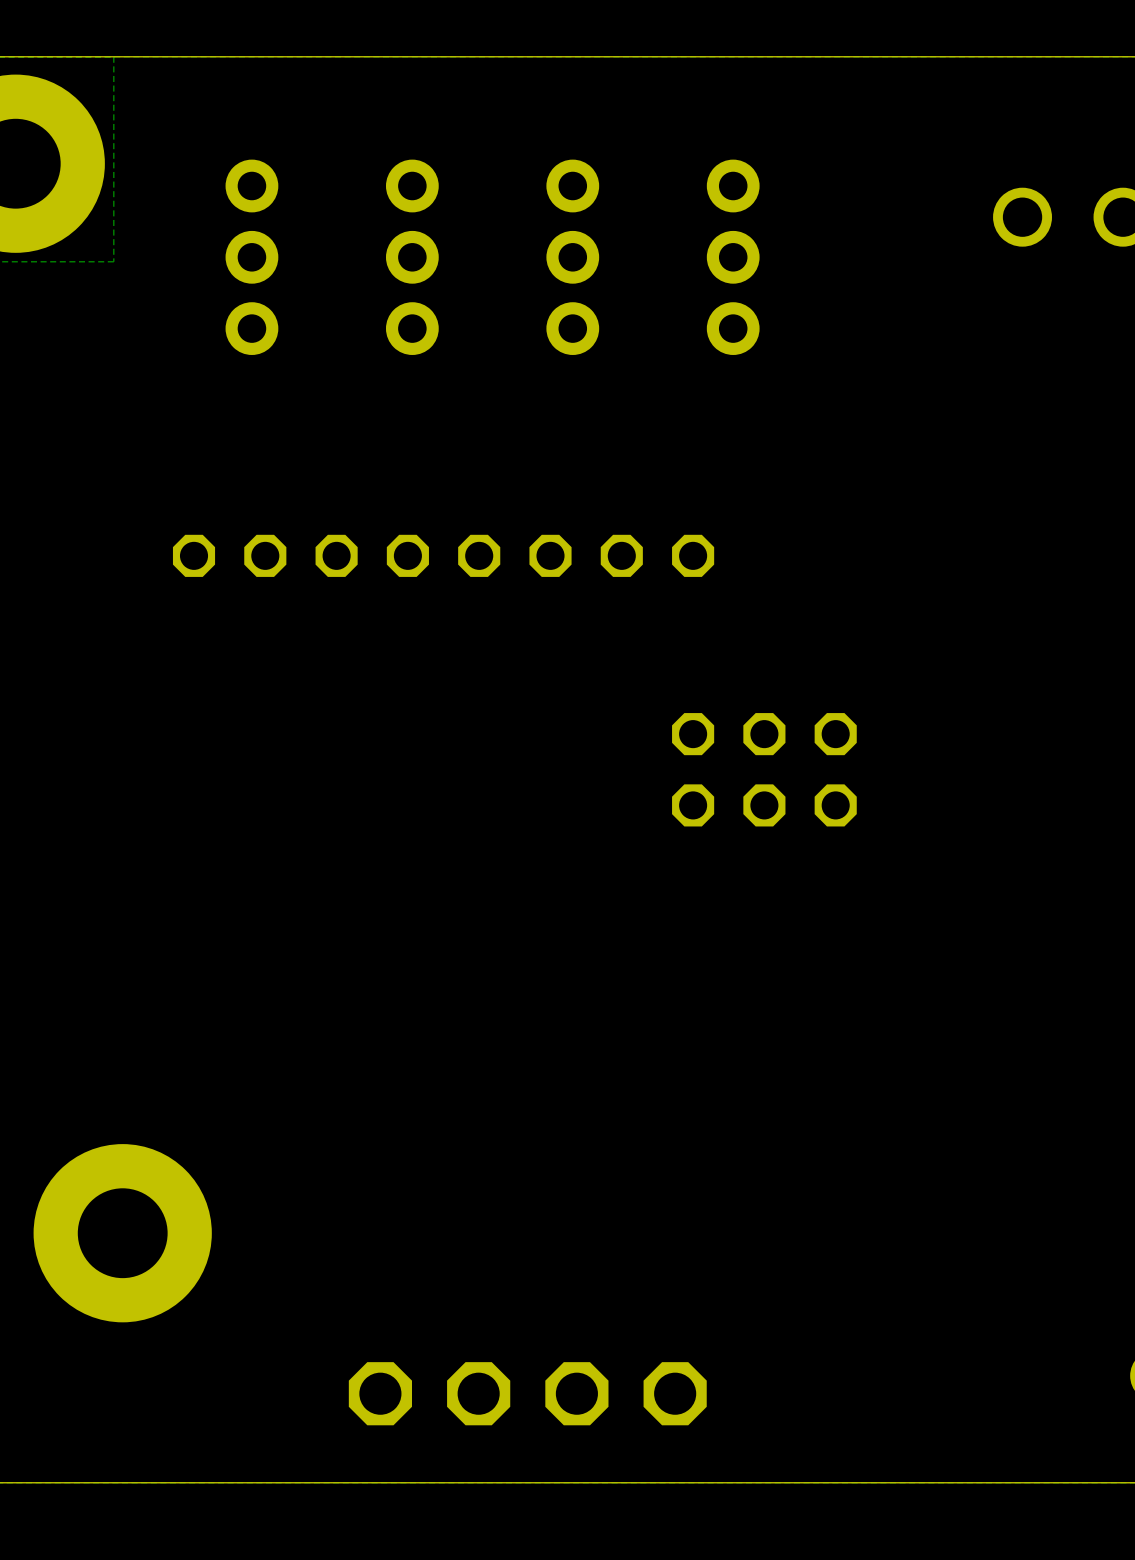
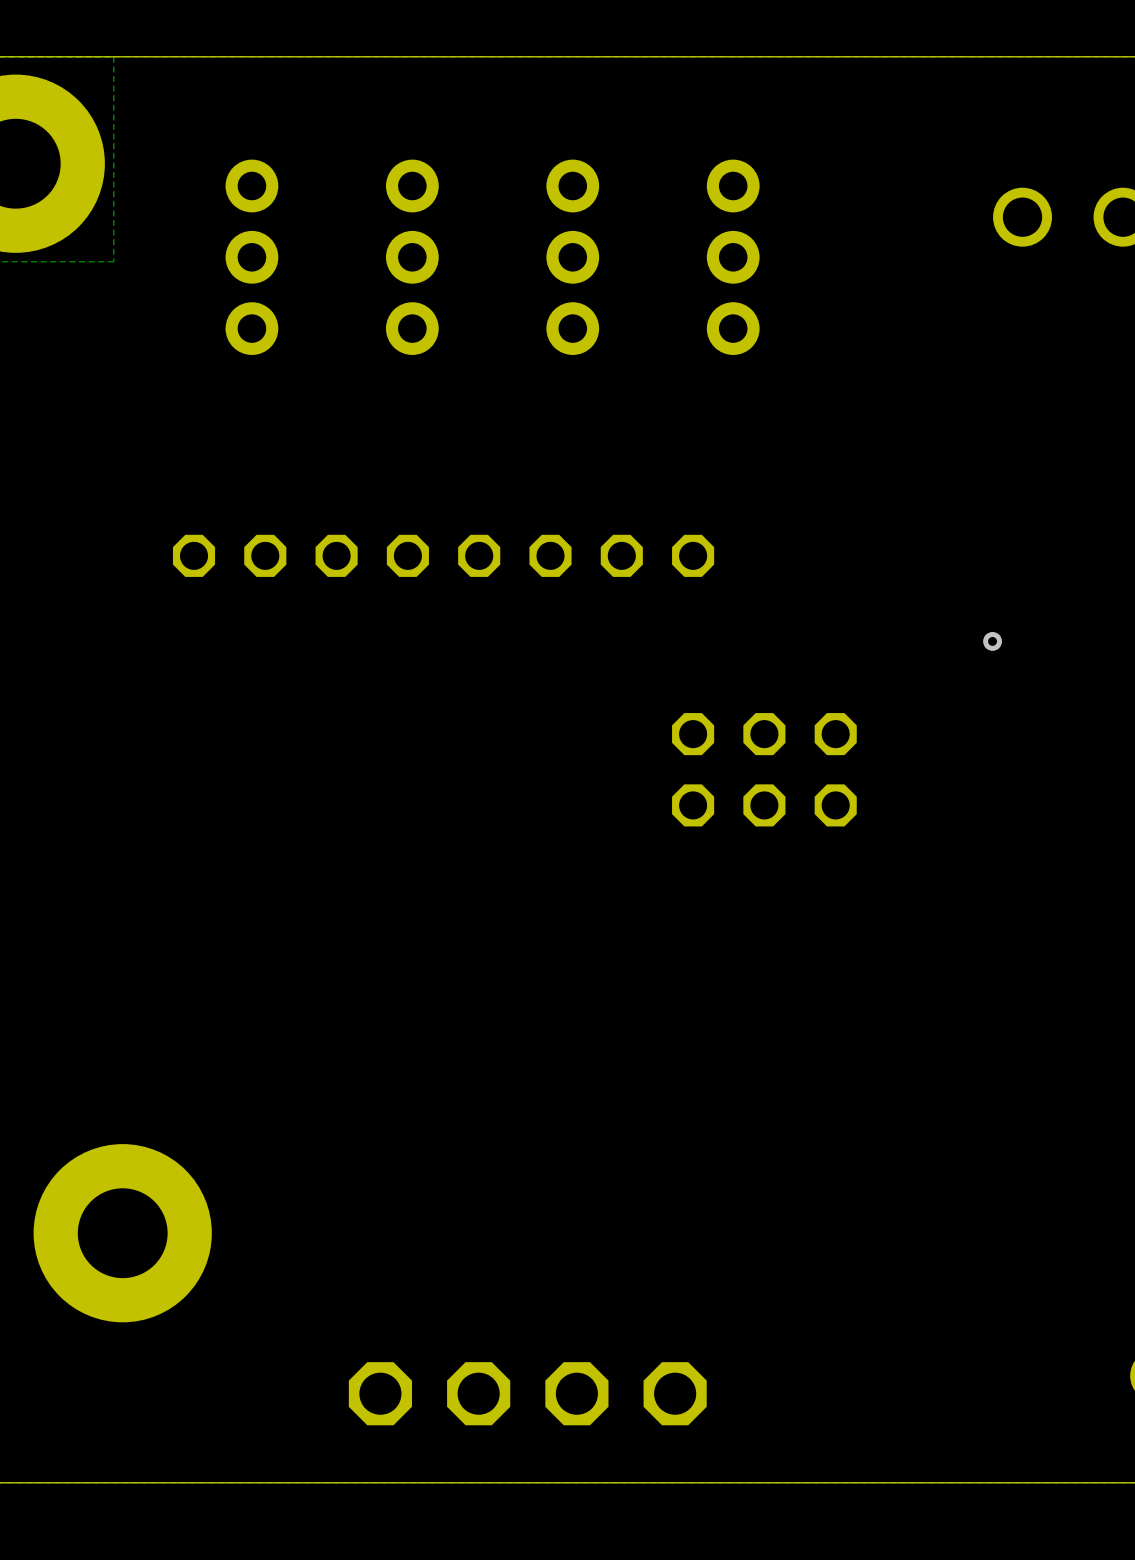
via: none -> (992, 641)

